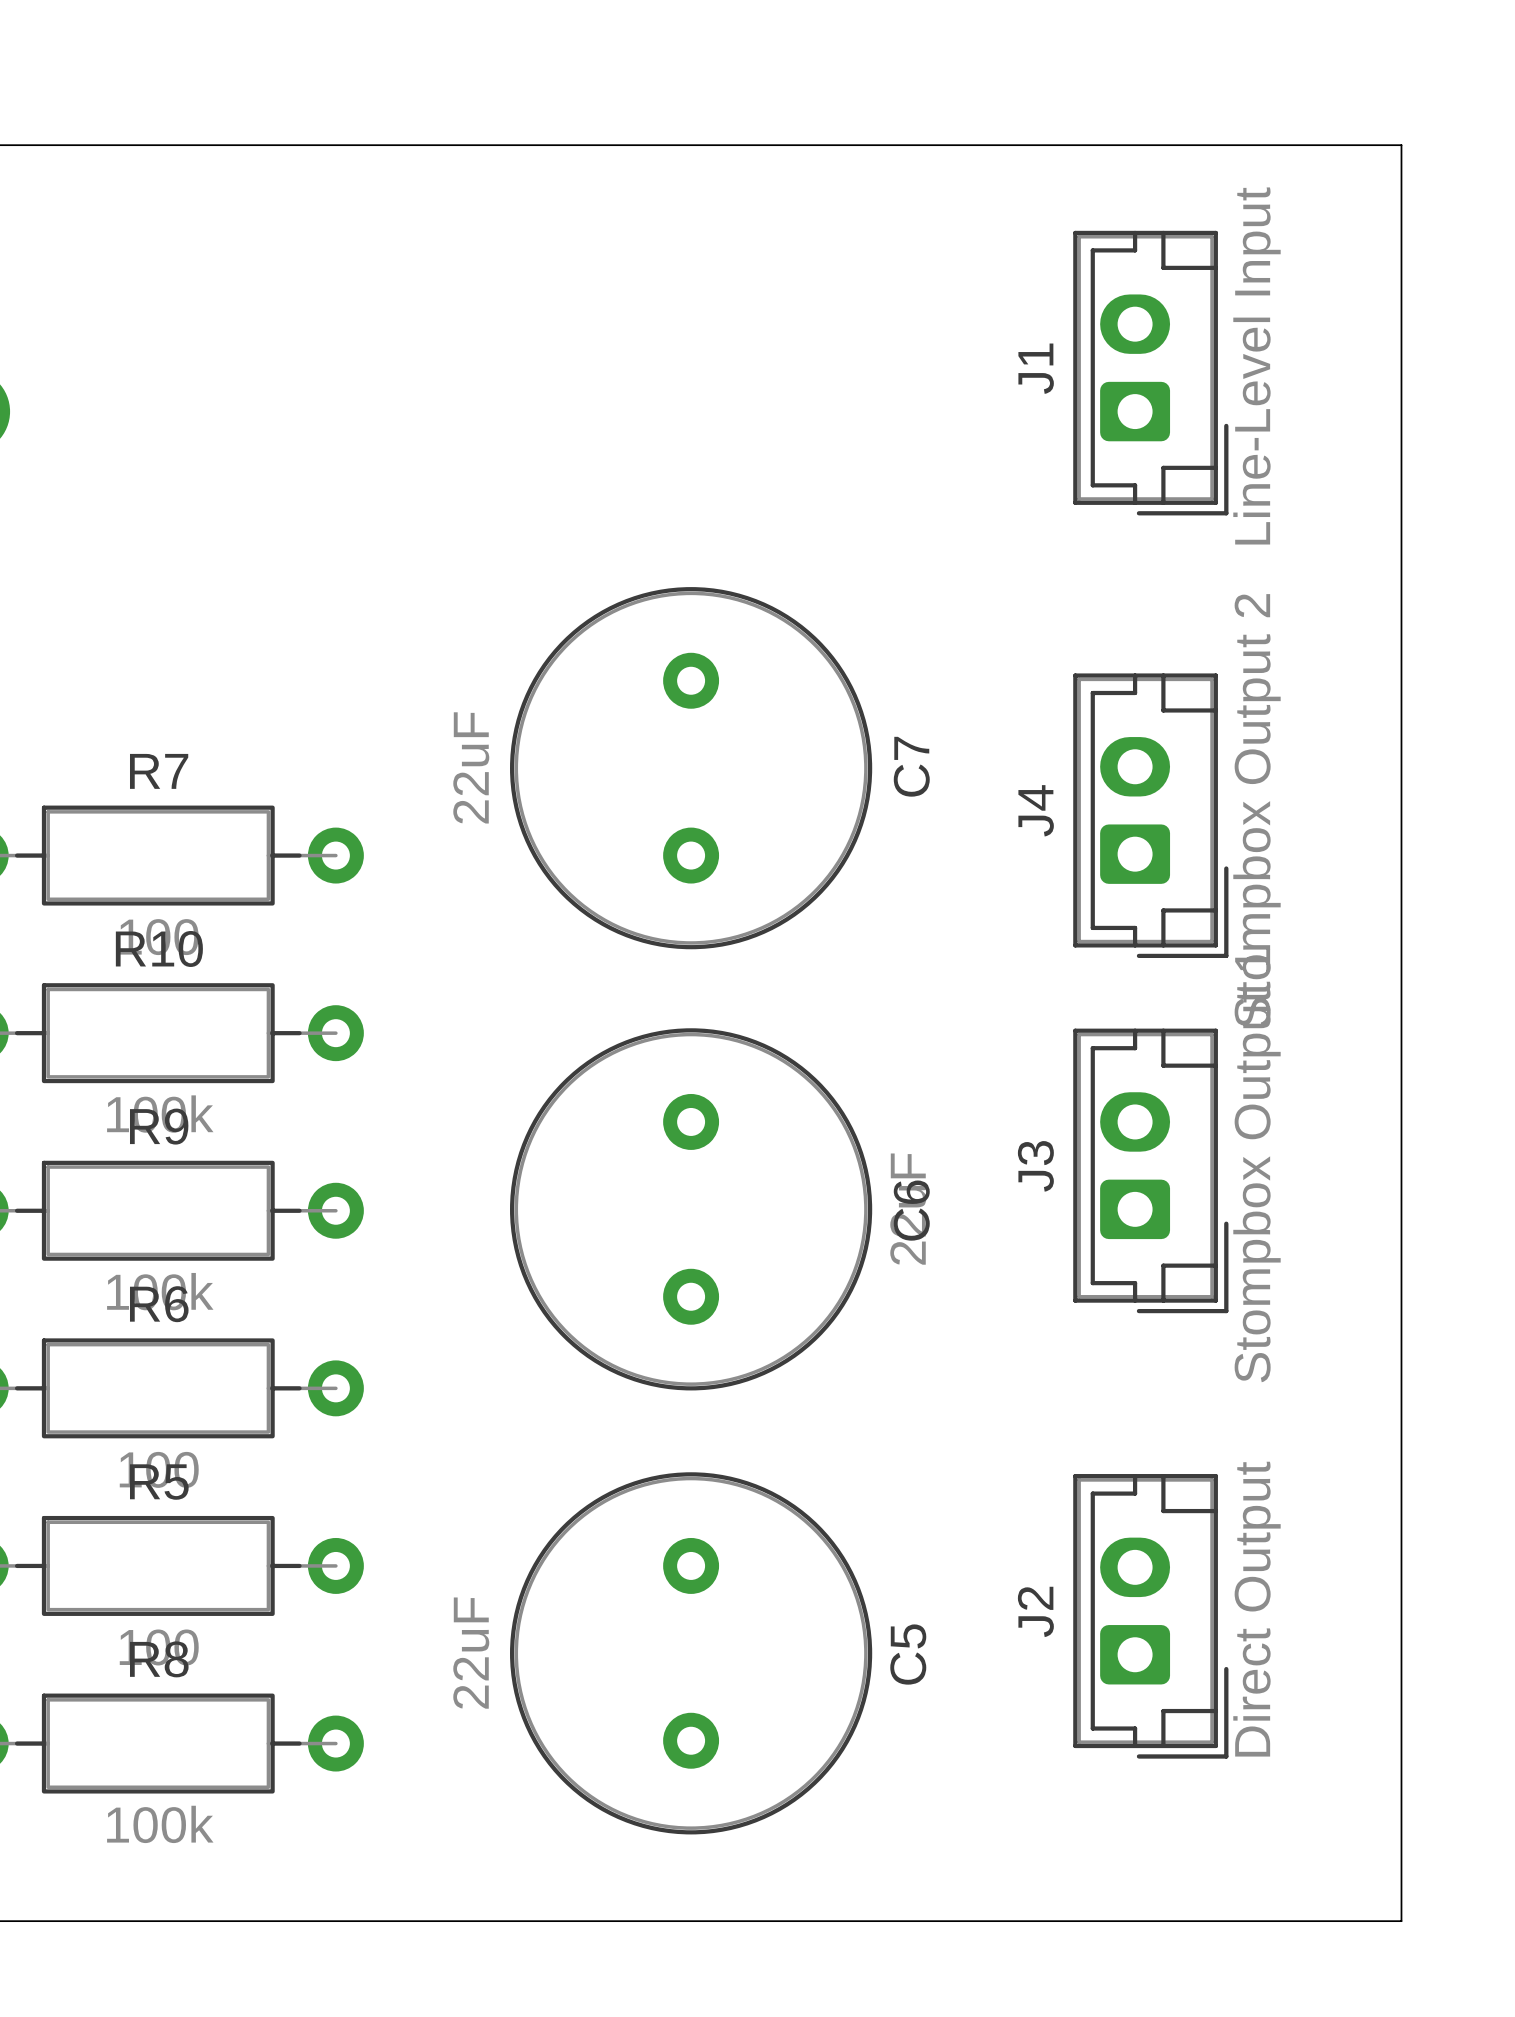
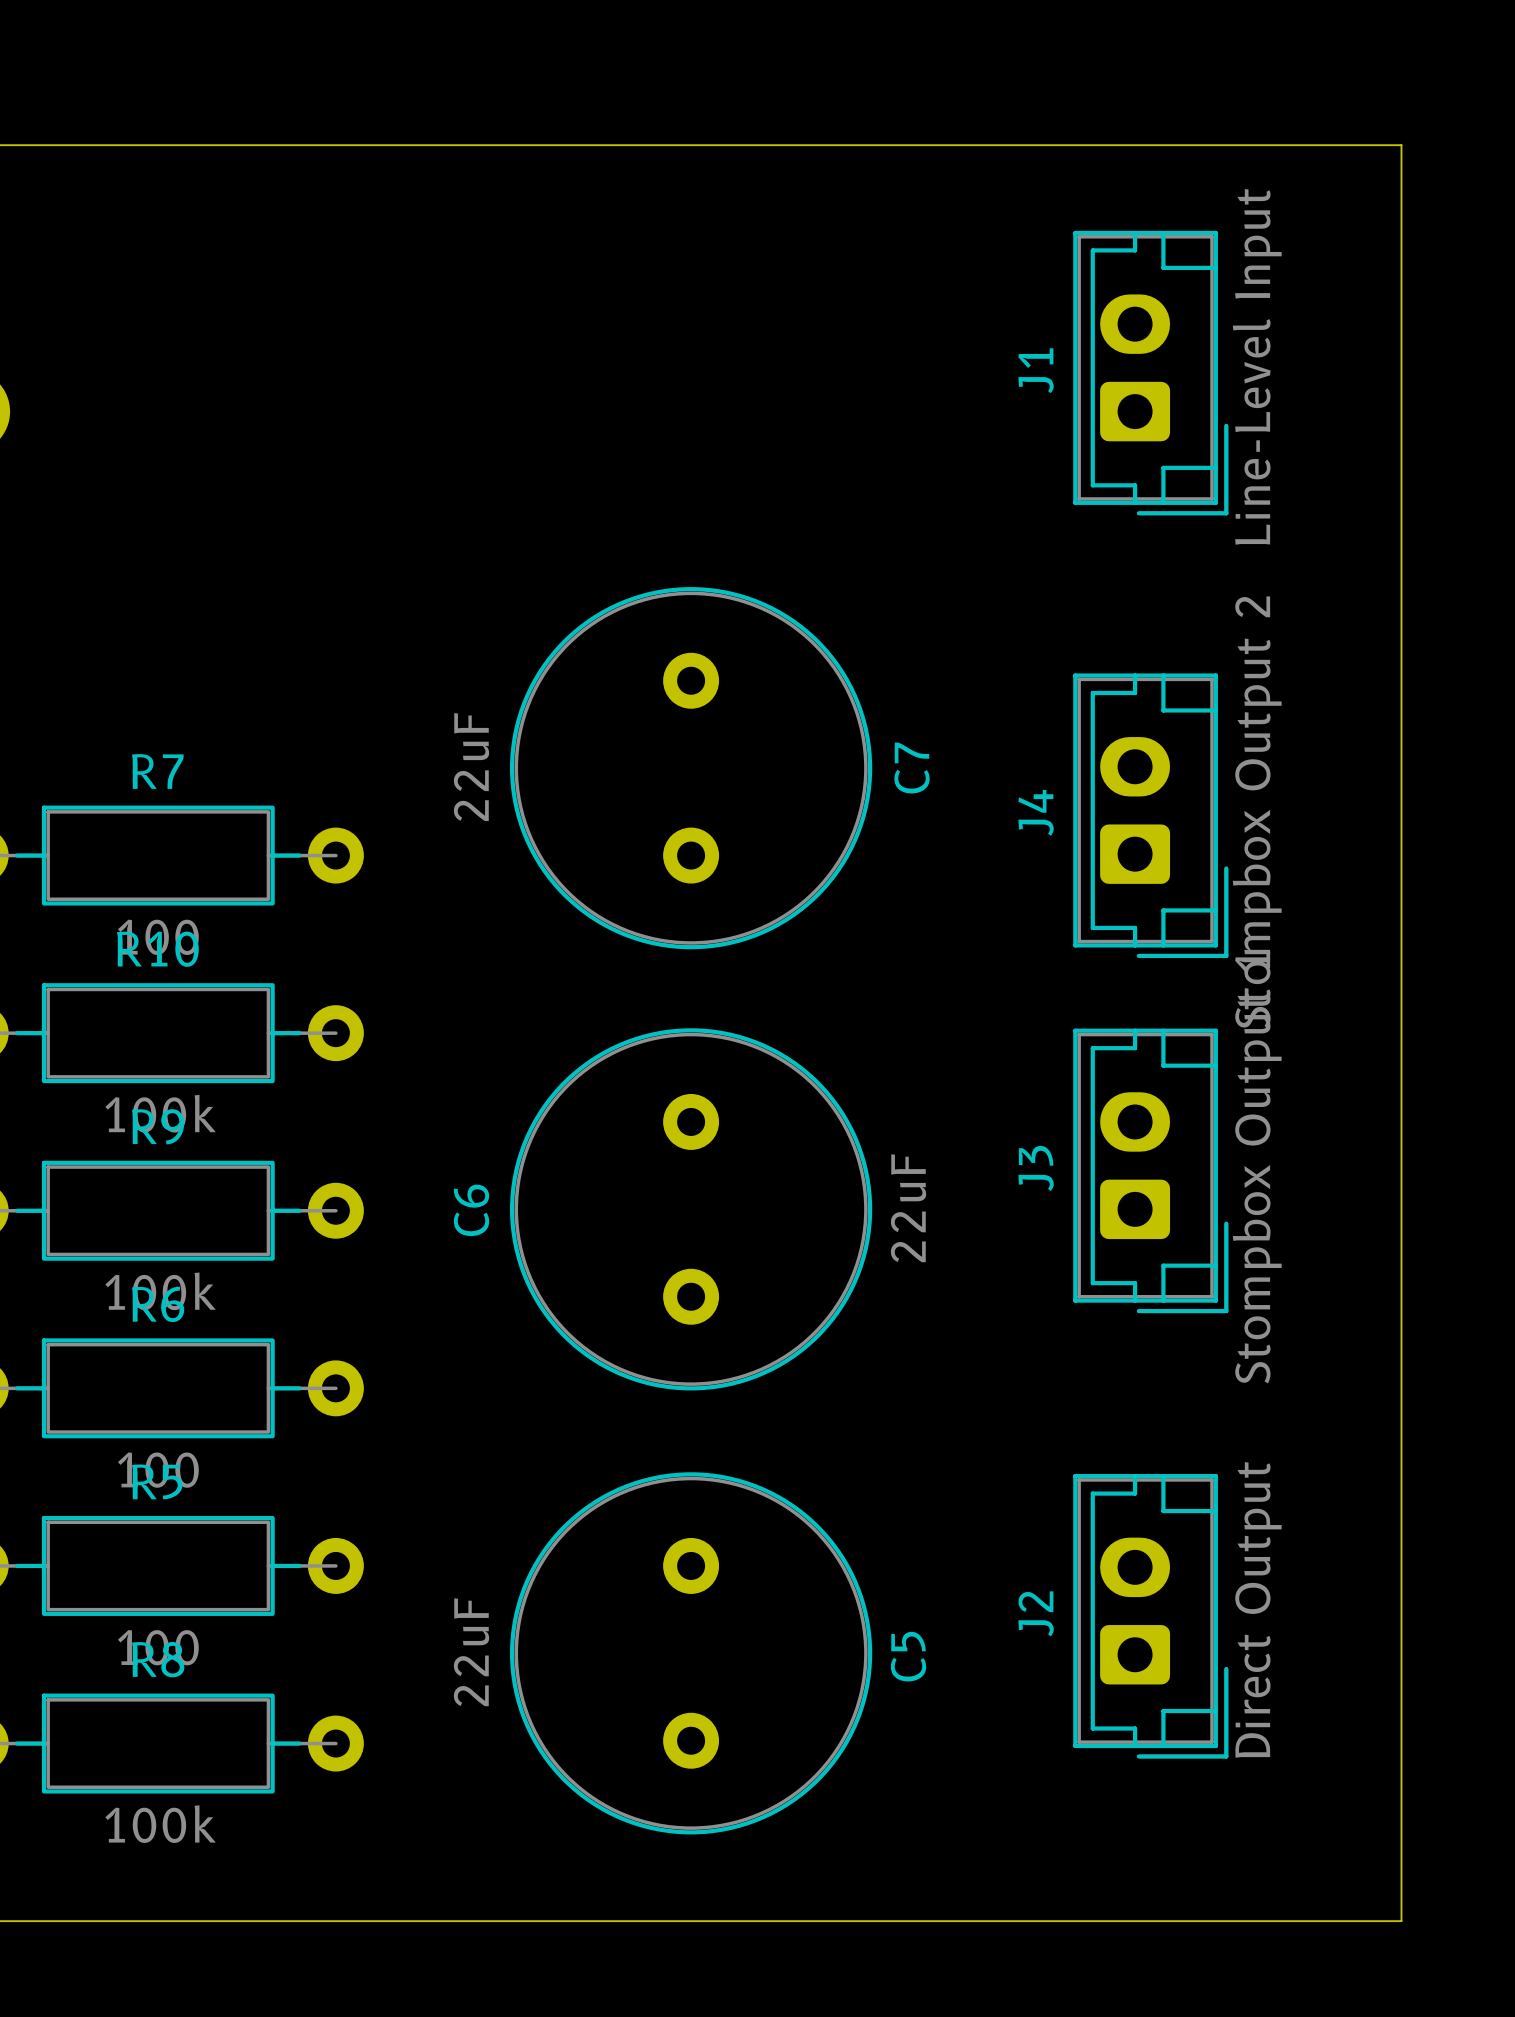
C6 name position: C6 (911, 1210) -> C6 (471, 1210)

